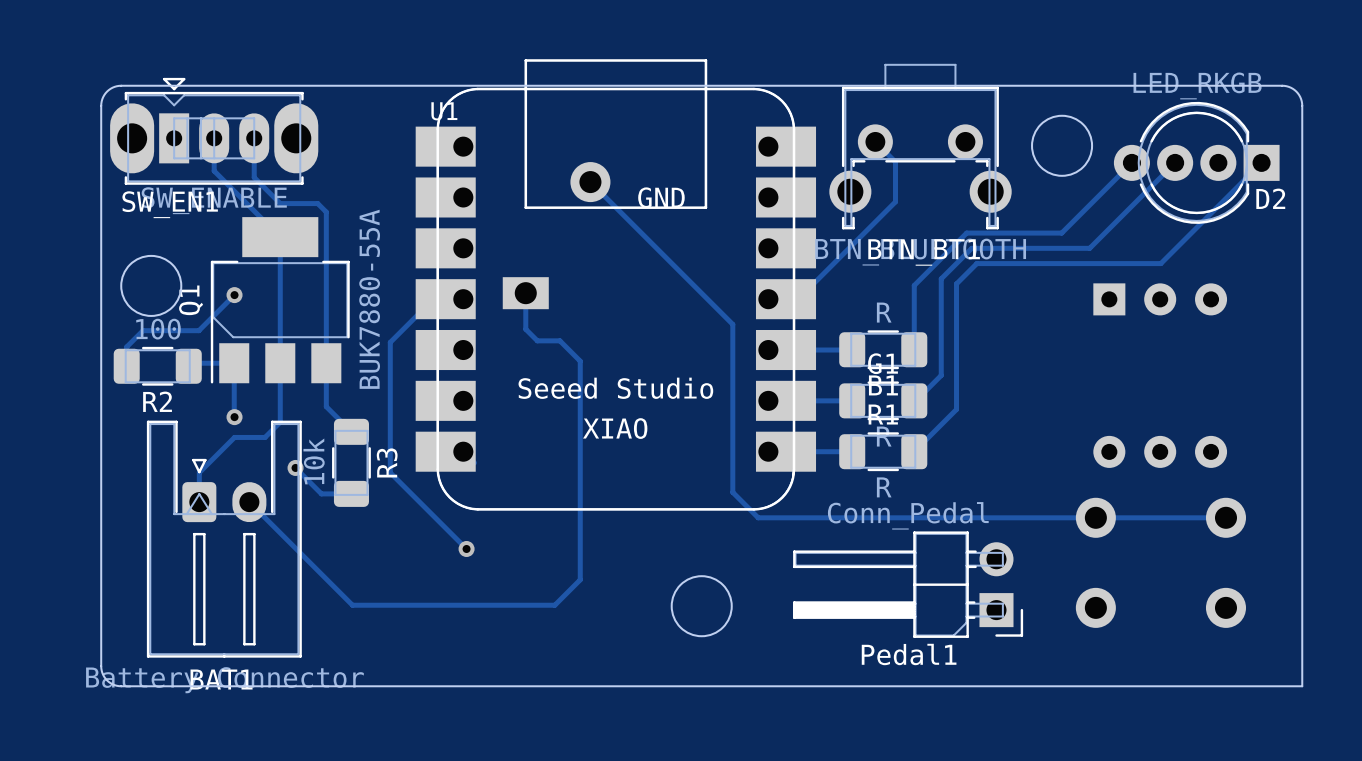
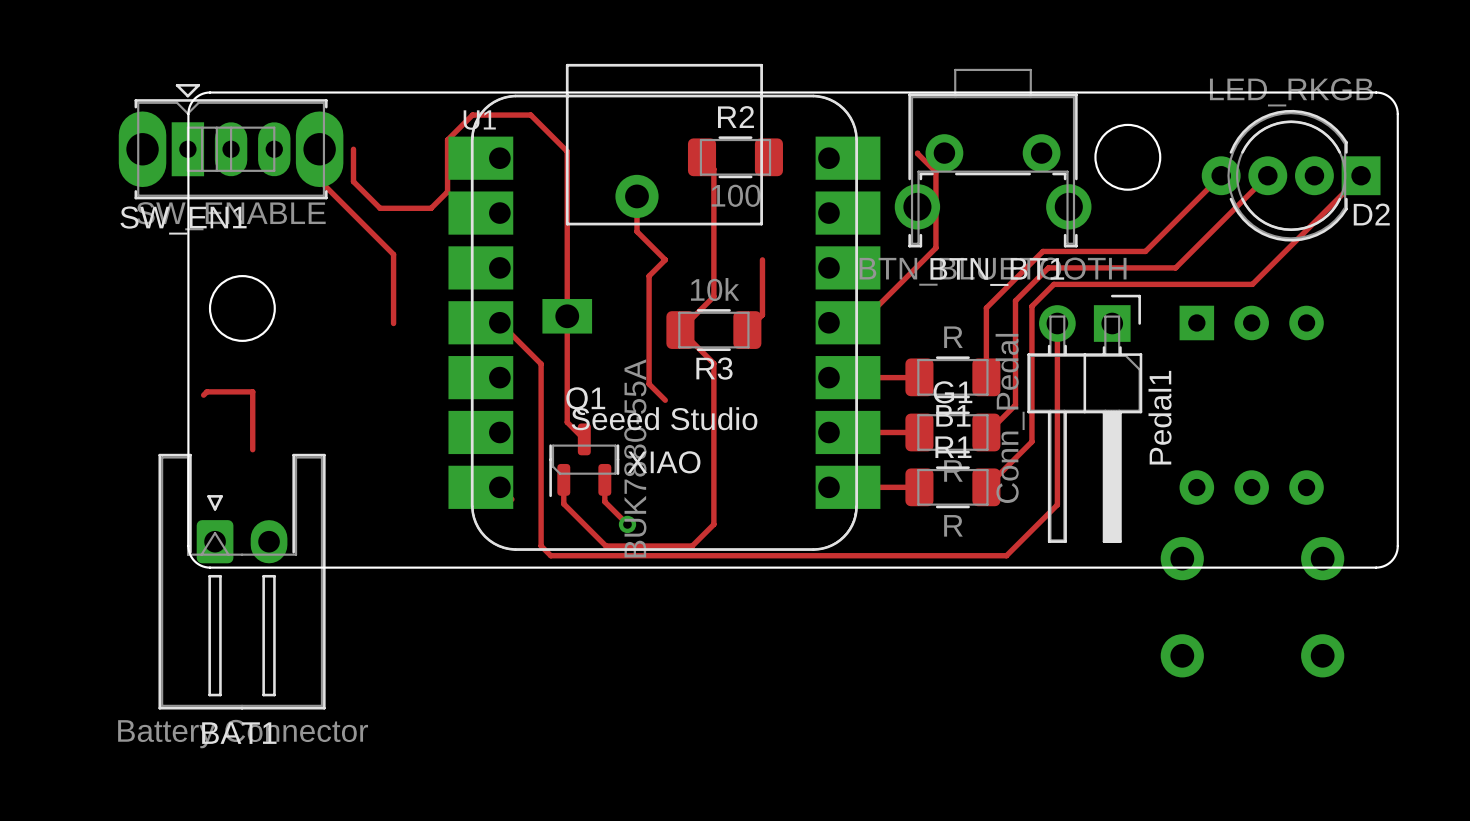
board edge: (194, 85) (116, 86) (107, 91) (101, 103) (101, 666) (105, 678) (118, 686) (1302, 686) (1302, 105) (1300, 97) (1294, 90) (1286, 86) (1275, 85) -> (210, 92) (202, 93) (194, 98) (189, 106) (188, 114) (188, 546) (190, 555) (194, 561) (200, 565) (210, 567) (1383, 566) (1394, 557) (1397, 546) (1397, 114) (1396, 106) (1391, 98) (1383, 93) (1376, 92)
track: (214, 138) (214, 171) (280, 237) (280, 422) (265, 437) (234, 437) (199, 472) (199, 502) -> none
track: (254, 138) (254, 177) (280, 203) (317, 203) (326, 212) (326, 406) (351, 431) -> none
track: none -> (310, 149) (310, 171) (393, 254) (393, 323)
track: none -> (353, 149) (353, 181) (380, 208) (431, 208) (447, 191) (447, 140) (472, 115) (530, 115) (567, 151) (567, 316)
track: (875, 141) (895, 162) (895, 201) (867, 229) -> (917, 153) (935, 171) (935, 247)
track: none -> (702, 157) (713, 169) (713, 296) (680, 330) (713, 363) (713, 524) (692, 546) (605, 546) (563, 503) (563, 479)
round board edge position: (1062, 145) -> (1127, 157)
track: (590, 182) (732, 324) (732, 492) (758, 517) (1225, 517) -> (637, 196) (637, 231) (665, 259) (649, 276) (649, 384) (665, 400)
text: GND (661, 197) -> none
Q1 footprint: [210, 217, 350, 384] -> [549, 423, 620, 498]
track: none -> (762, 259) (762, 314) (747, 330)
round board edge position: (151, 285) -> (242, 308)
track: (234, 295) (198, 330) (143, 330) (126, 346) (126, 366) -> none
via: (234, 295) -> none
Q1 value position: BUK7880-55A (369, 299) -> BUK7880-55A (635, 458)
track: (463, 299) (433, 299) (390, 342) (390, 472) (466, 548) -> (499, 322) (541, 364) (541, 546) (550, 555) (1006, 555) (1057, 504) (1057, 323)
Q1 name position: Q1 (191, 300) -> Q1 (585, 401)
R2 value position: 100 (158, 329) -> 100 (736, 195)
track: (525, 329) (537, 340) (559, 340) (580, 361) (580, 579) (554, 605) (352, 605) (249, 502) -> (567, 355) (567, 422) (584, 439)
R2 position: (157, 366) -> (735, 157)
R2 name position: R2 (157, 401) -> R2 (735, 117)
via: (234, 417) -> none
track: none -> (604, 479) (604, 501) (627, 524)
R3 rotation: 0° (351, 462) -> 90° clockwise (713, 330)
R3 position: (351, 462) -> (713, 330)
track: (295, 467) (321, 493) (351, 493) -> none
via: (295, 467) -> none
via: none -> (627, 524)
via: (466, 548) -> none
round board edge: [670, 575, 733, 638] -> none
Pedal1 rotation: 0° (908, 584) -> 90° counterclockwise (1084, 418)
Pedal1 position: (908, 584) -> (1084, 418)

